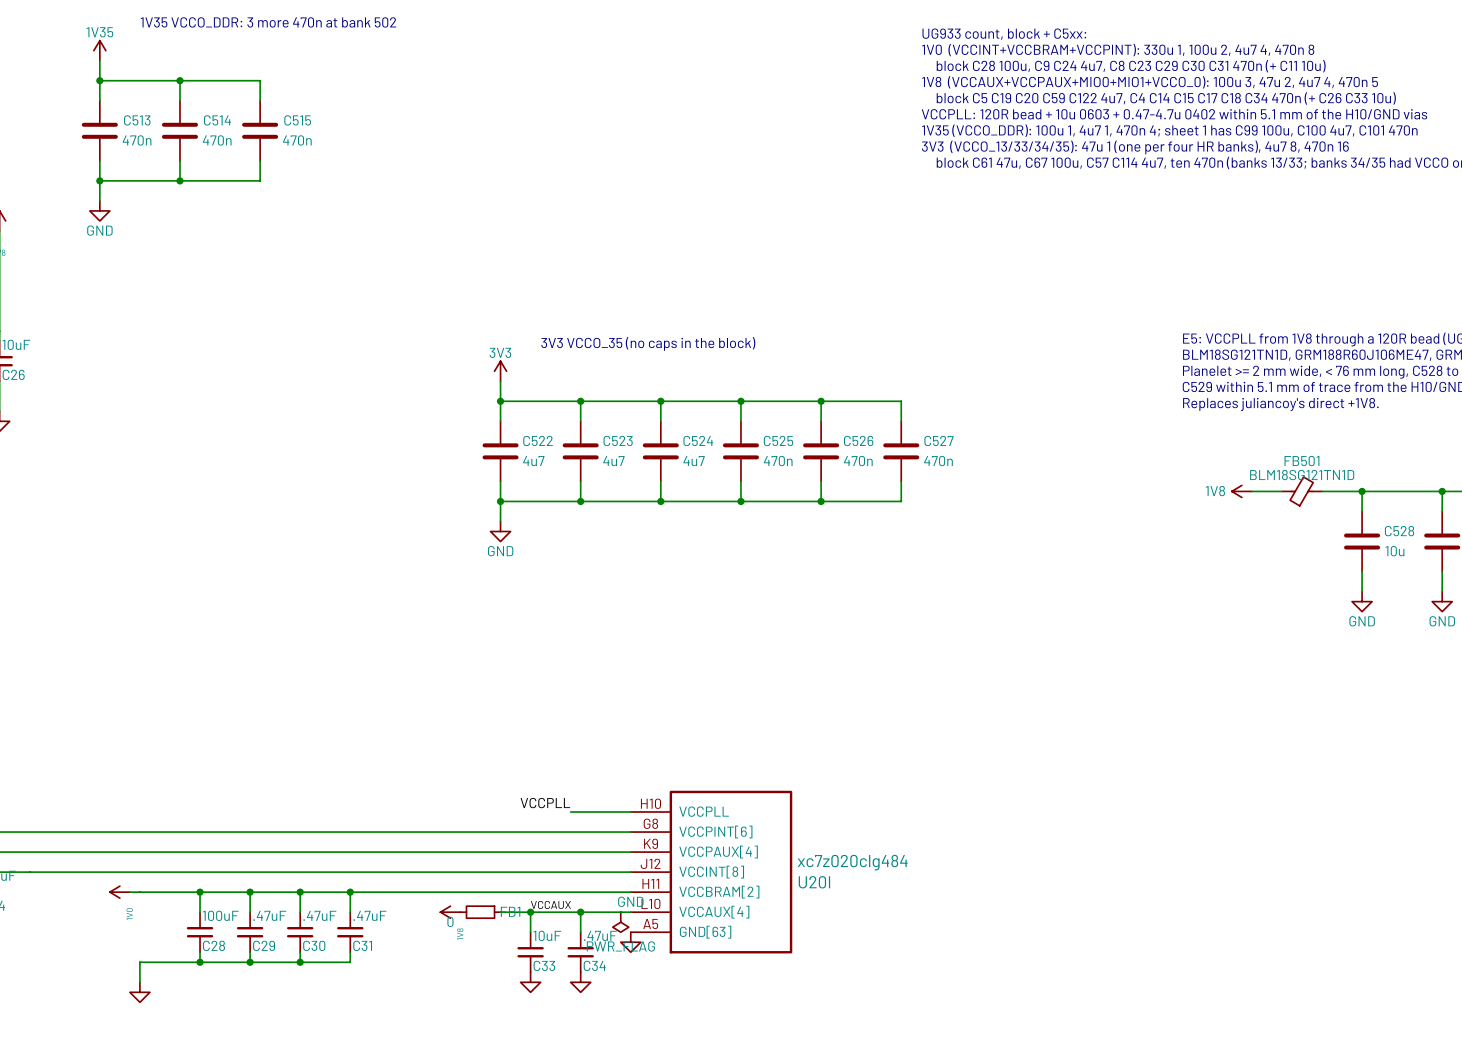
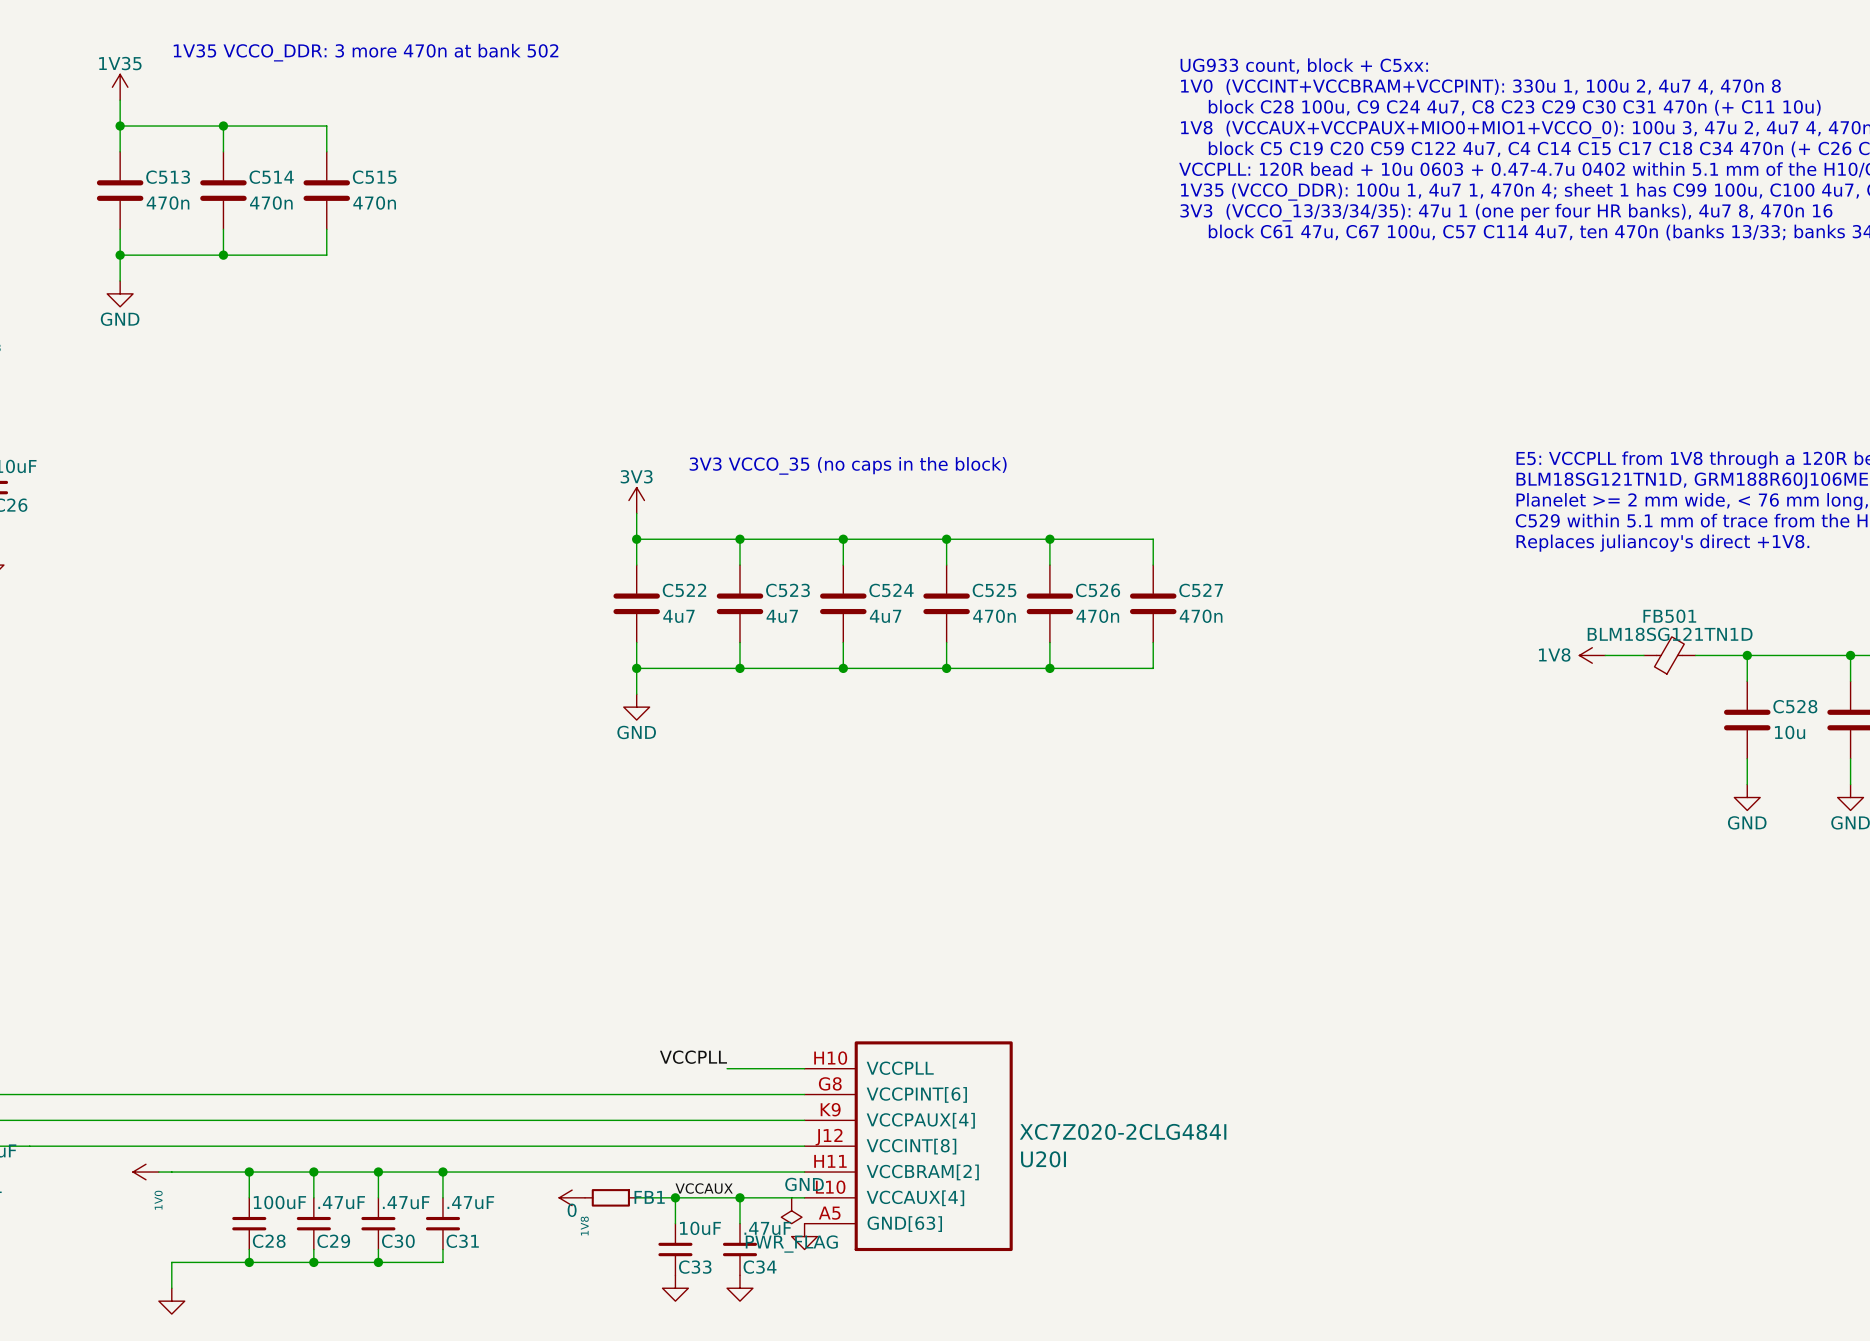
U20I value: xc7z020clg484 (852, 862) -> XC7Z020-2CLG484I (1123, 1131)

